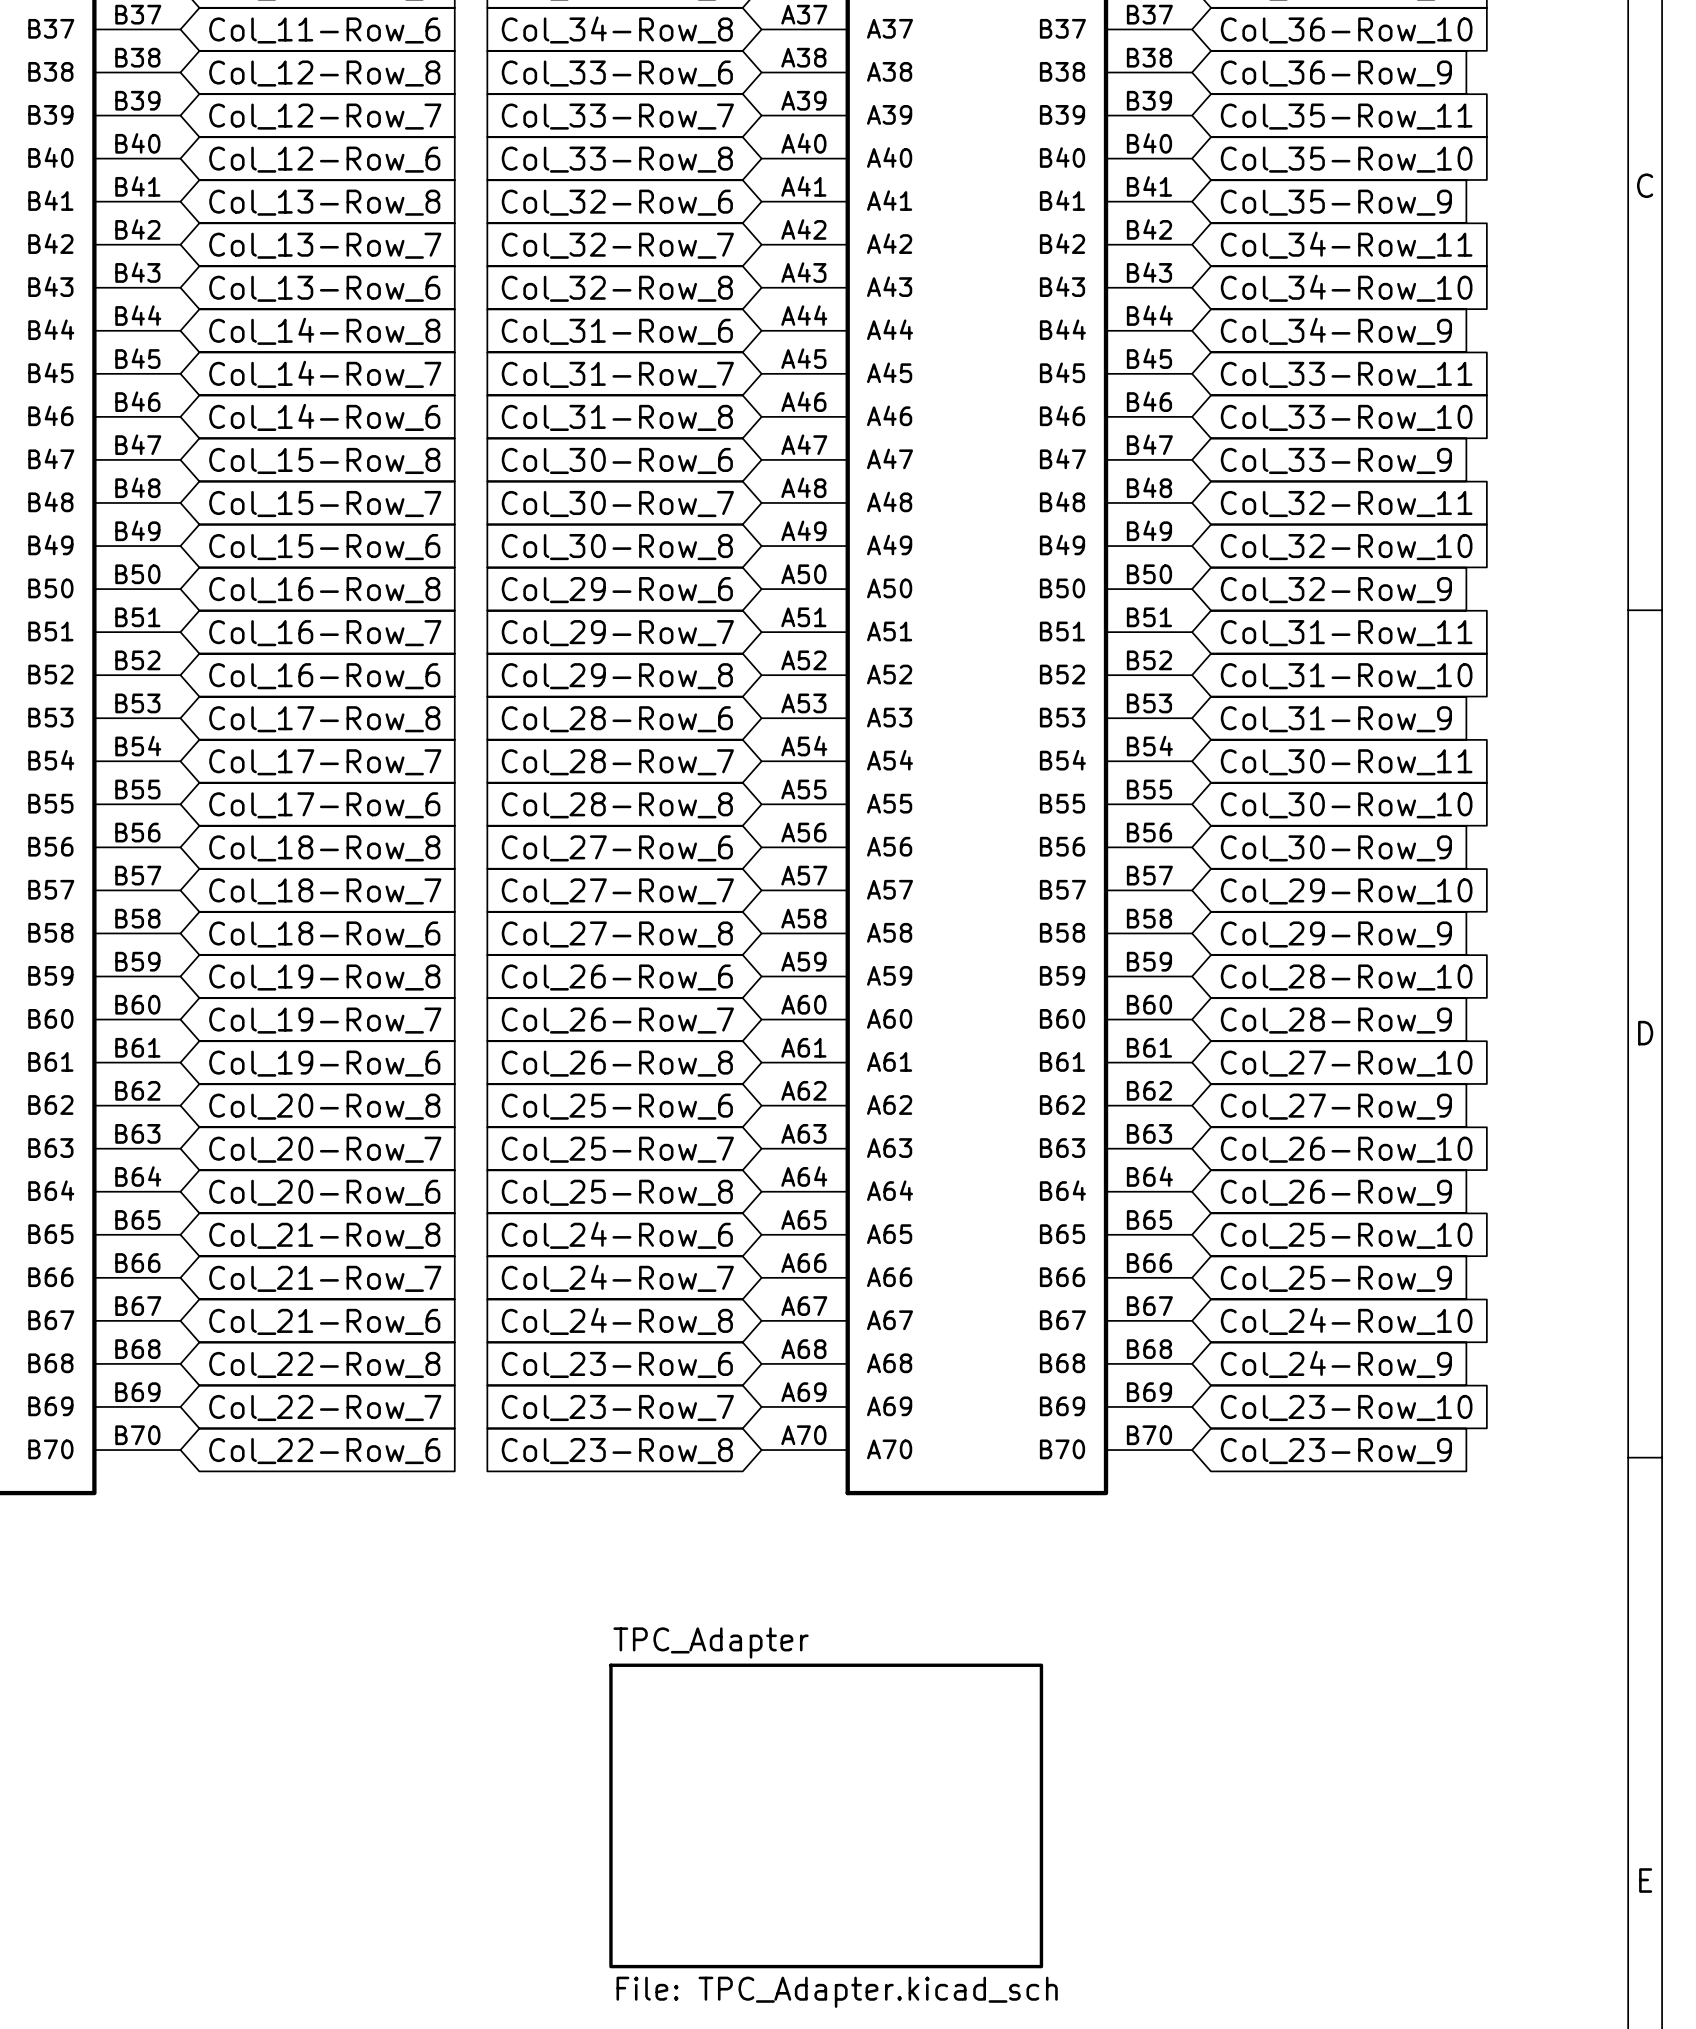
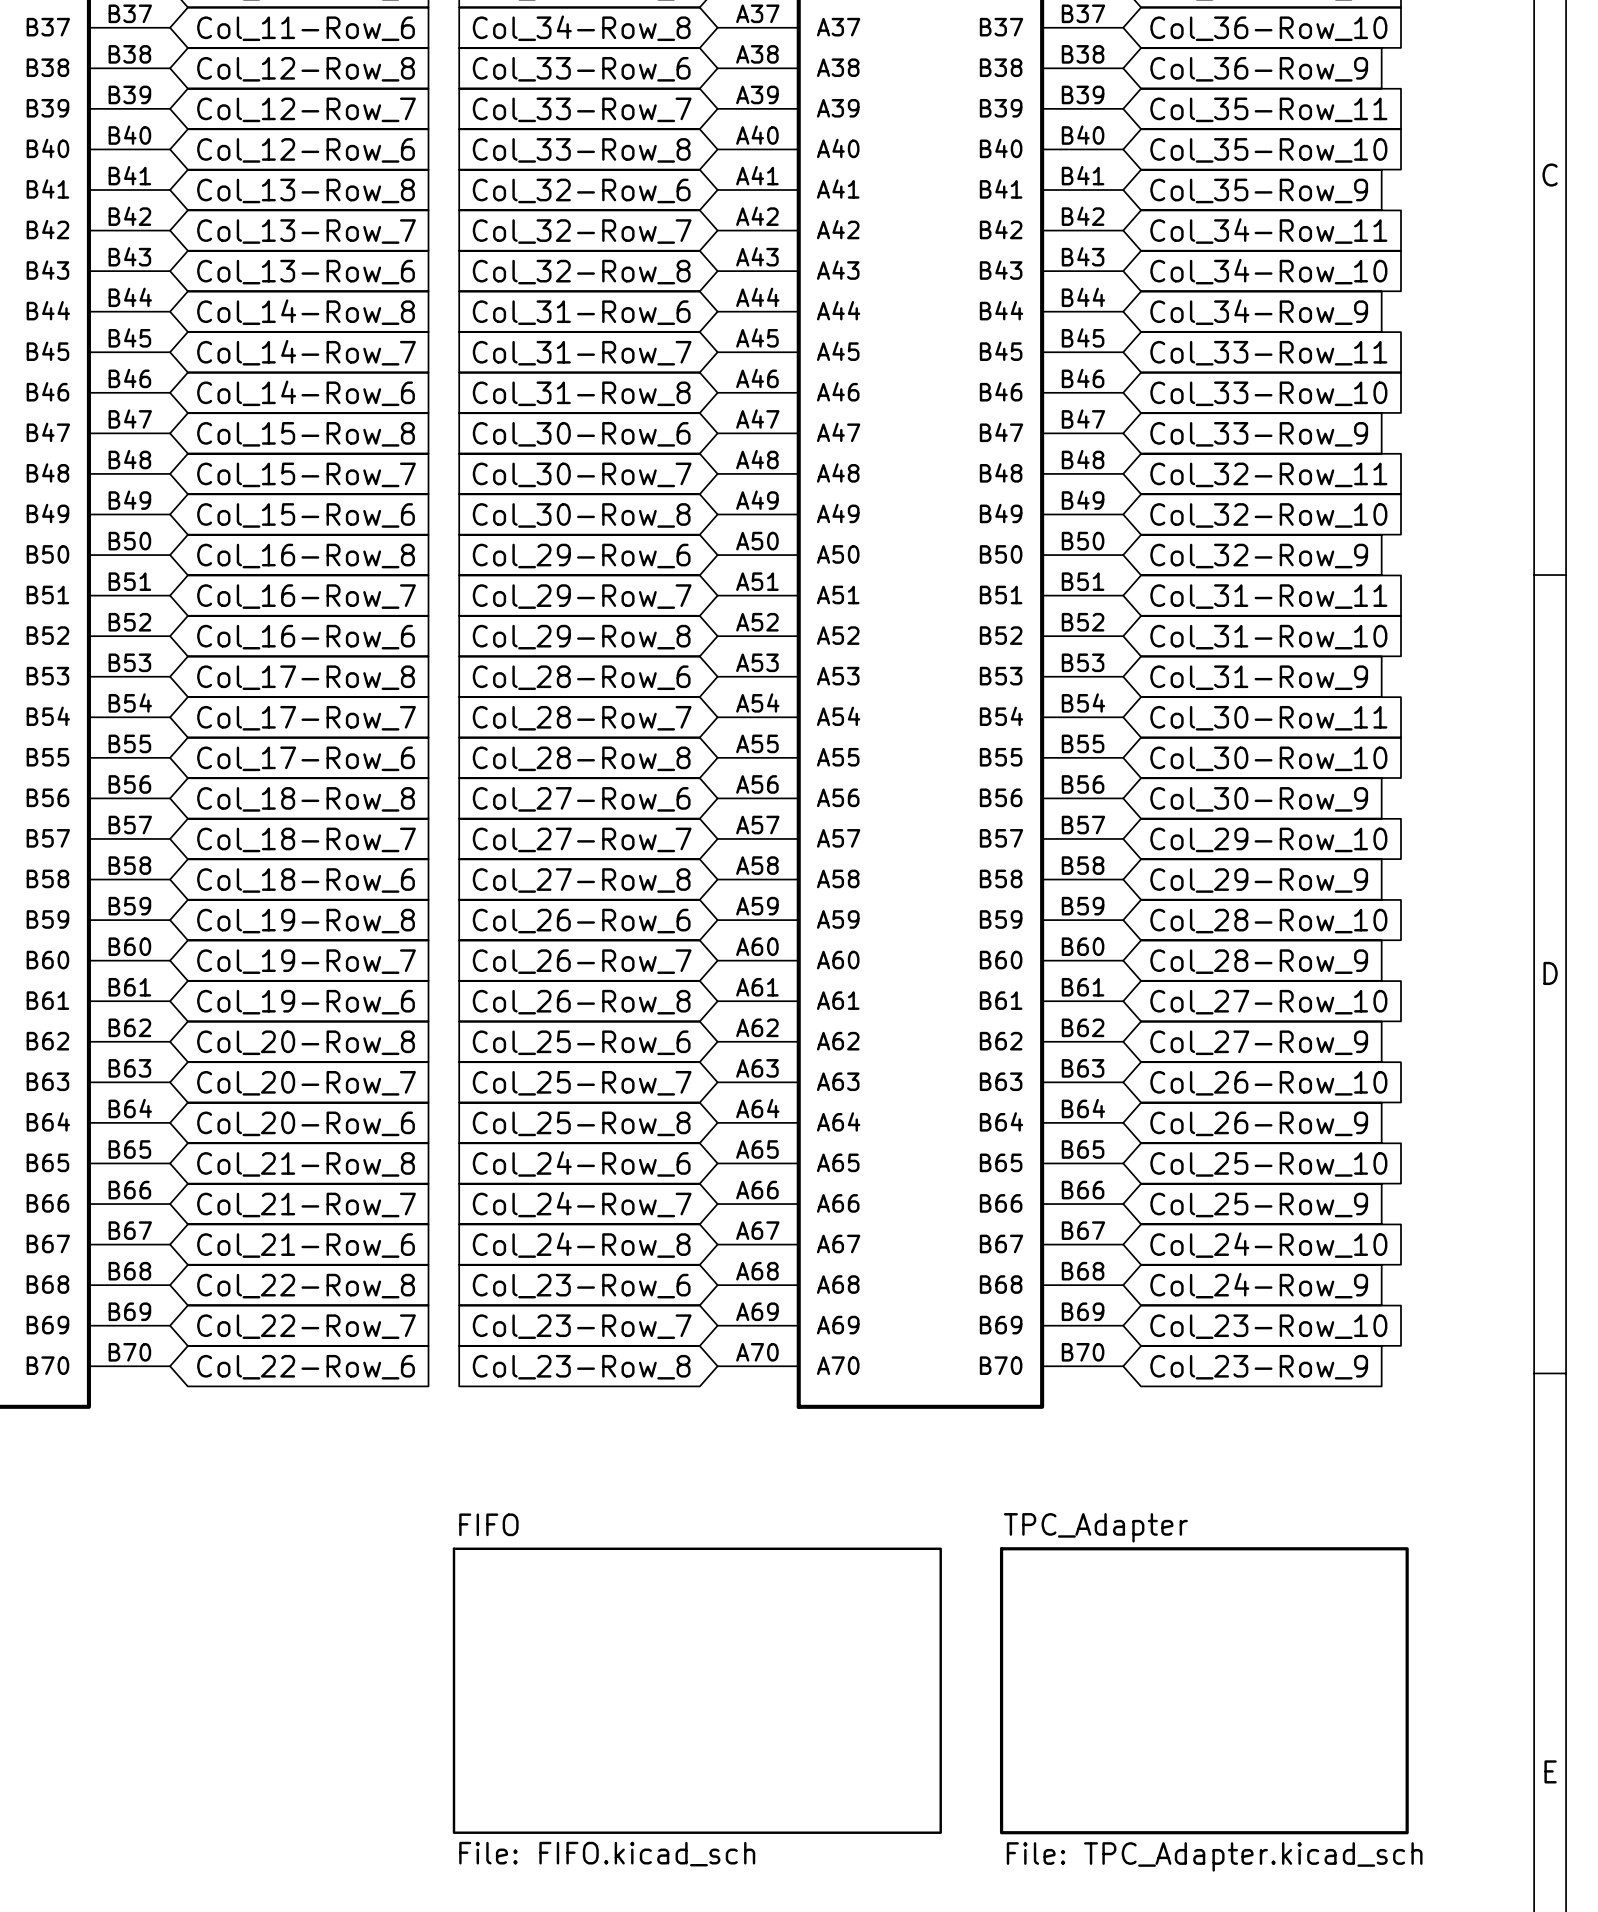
sheet FIFO: none -> File: FIFO.kicad_sch (697, 1690)
sheet TPC_Adapter: none -> File: TPC_Adapter.kicad_sch (1204, 1690)
sheet TPC_Adapter: File: TPC_Adapter.kicad_sch (826, 1815) -> none

